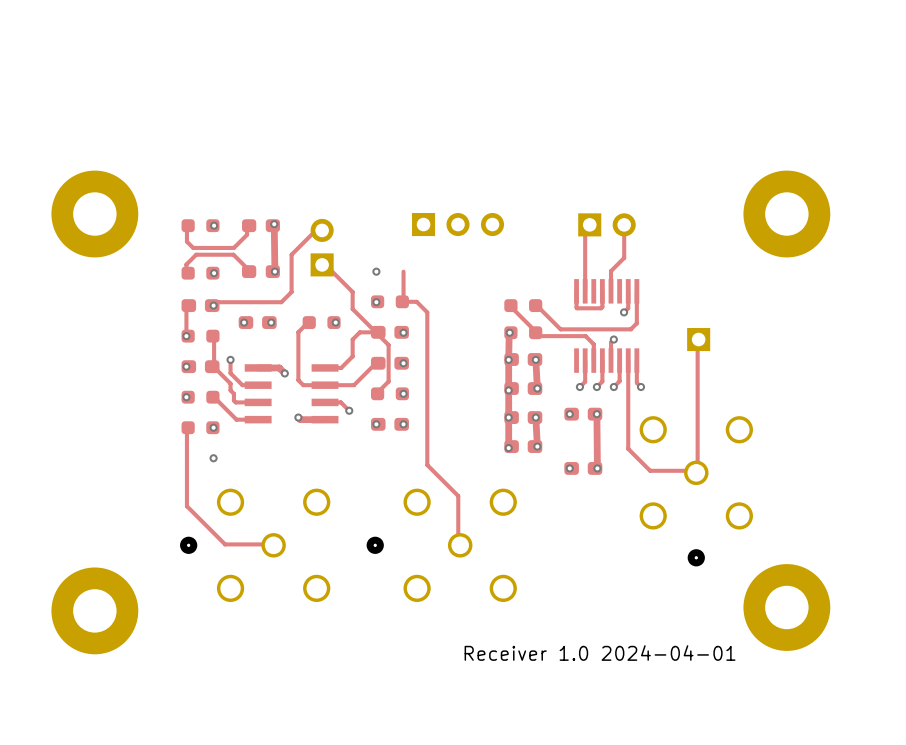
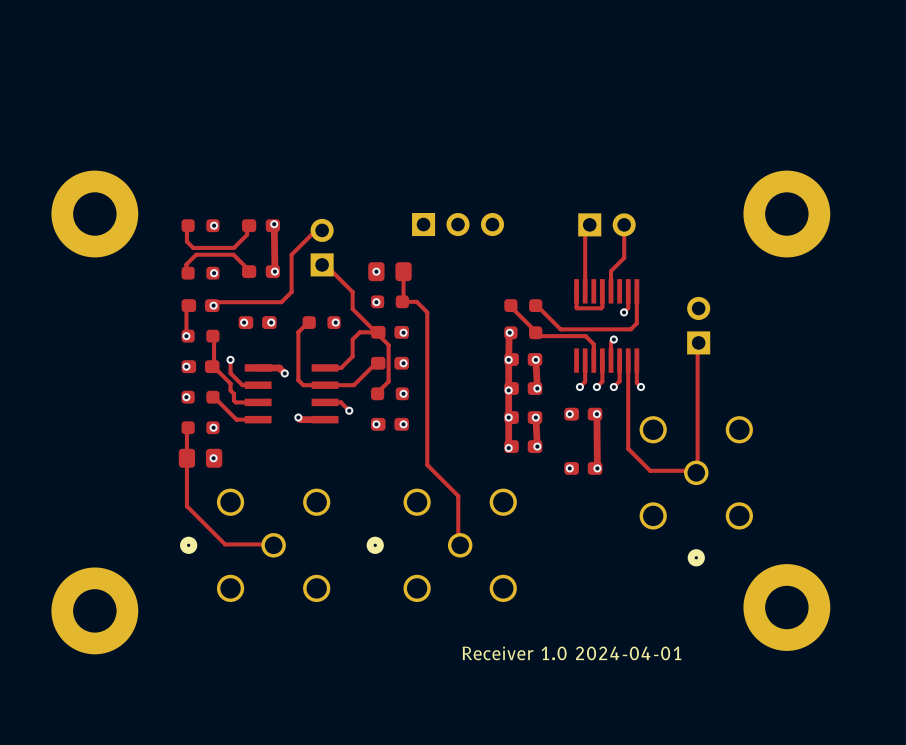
part: none -> (389, 271)
part: none -> (698, 325)
part: (698, 339) -> none
part: none -> (200, 458)

